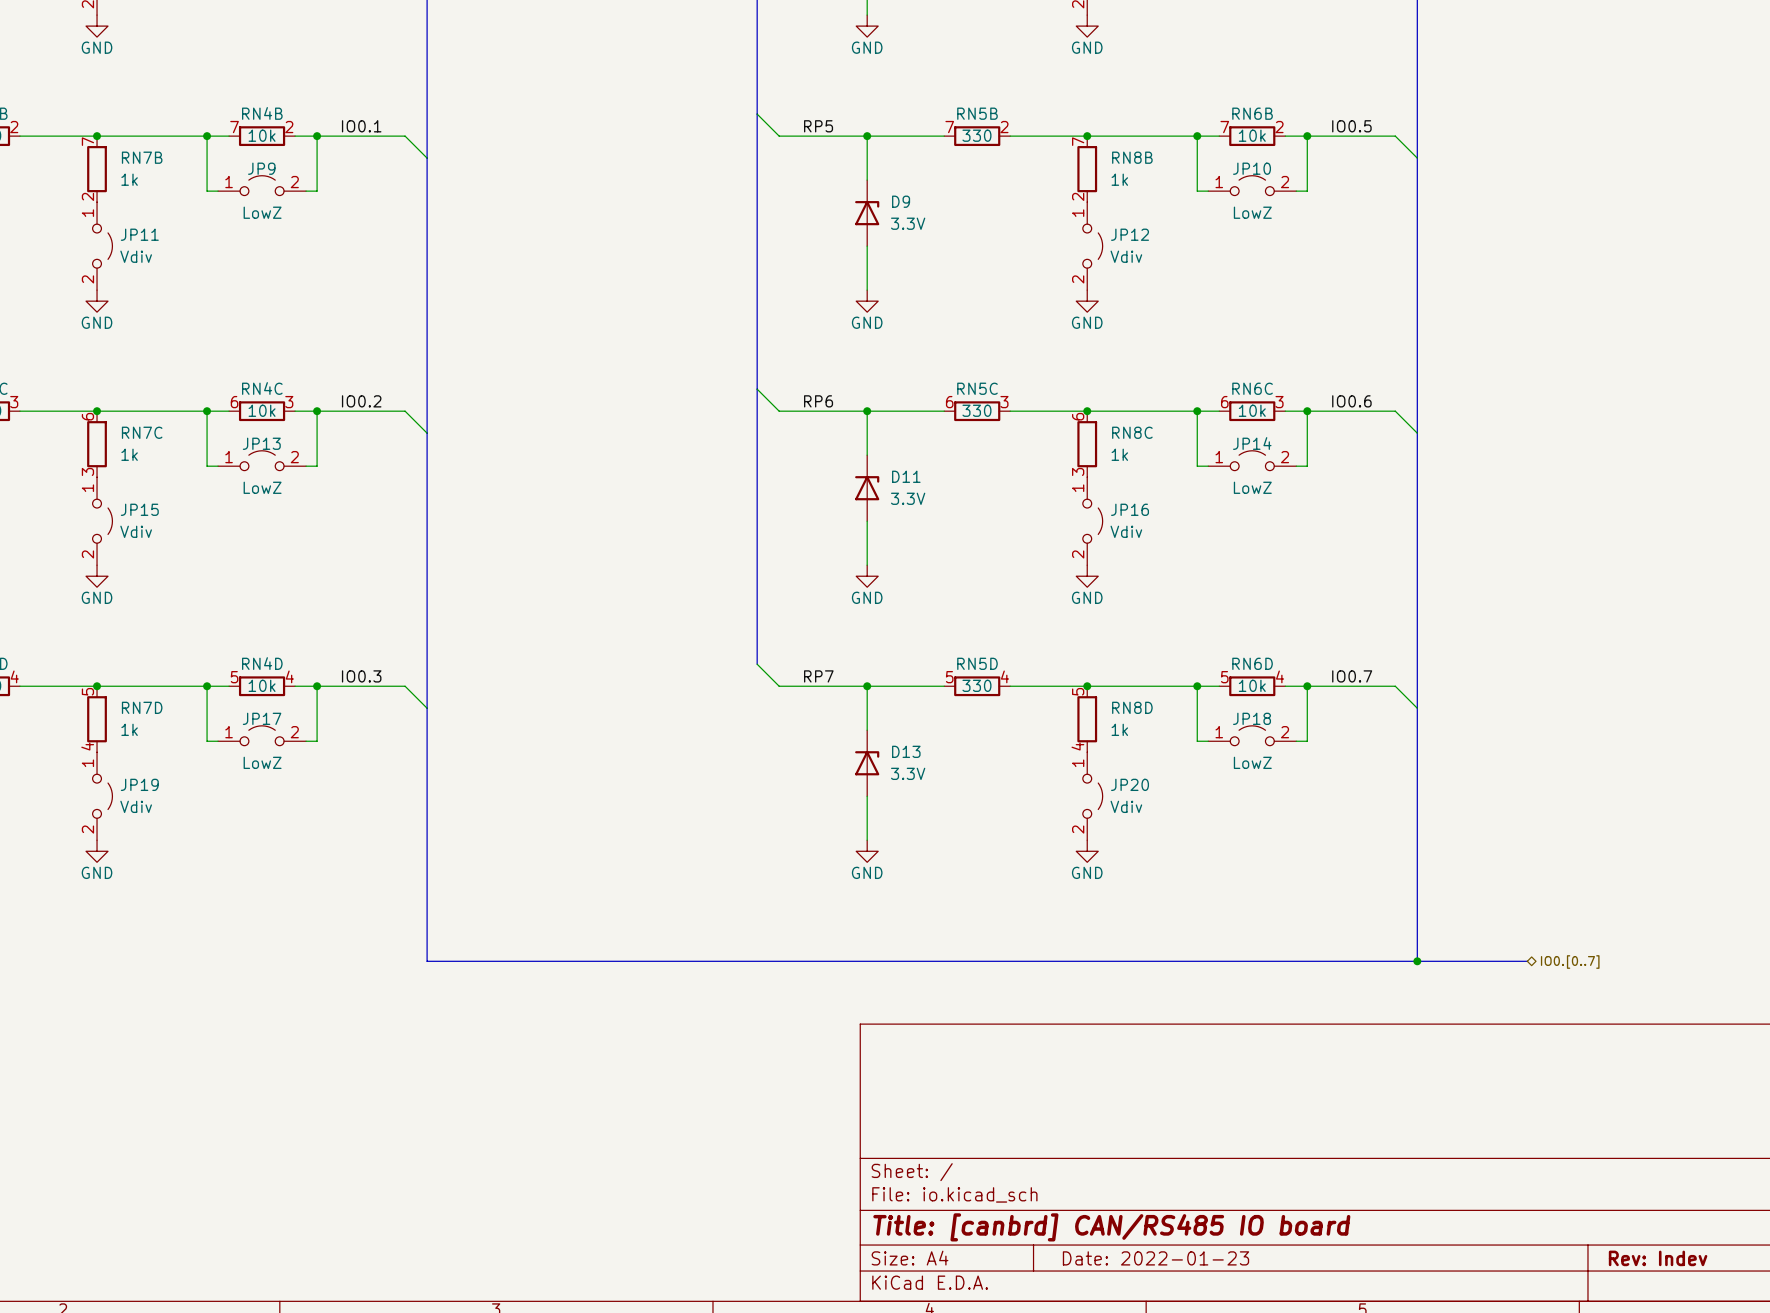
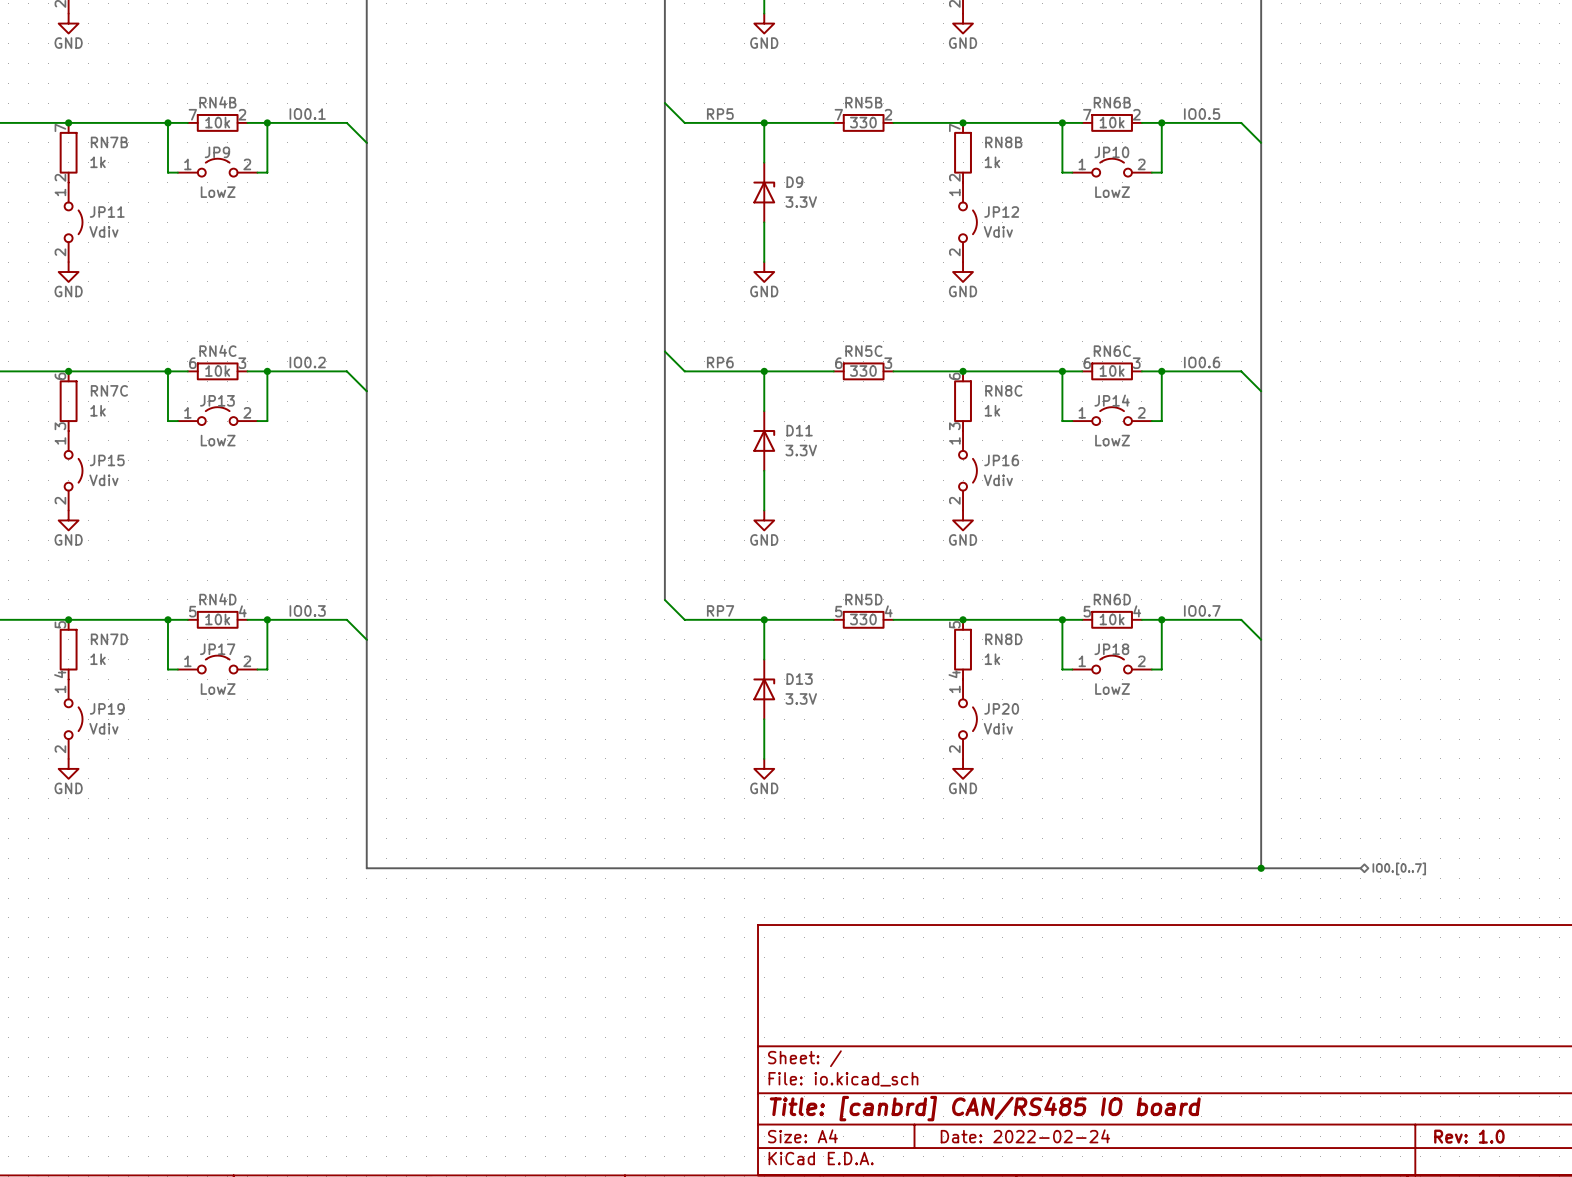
title block: Date: 2022-01-23 (1155, 1258) -> Date: 2022-02-24 (1025, 1136)
title block: Rev: Indev (1658, 1258) -> Rev: 1.0 (1469, 1136)

